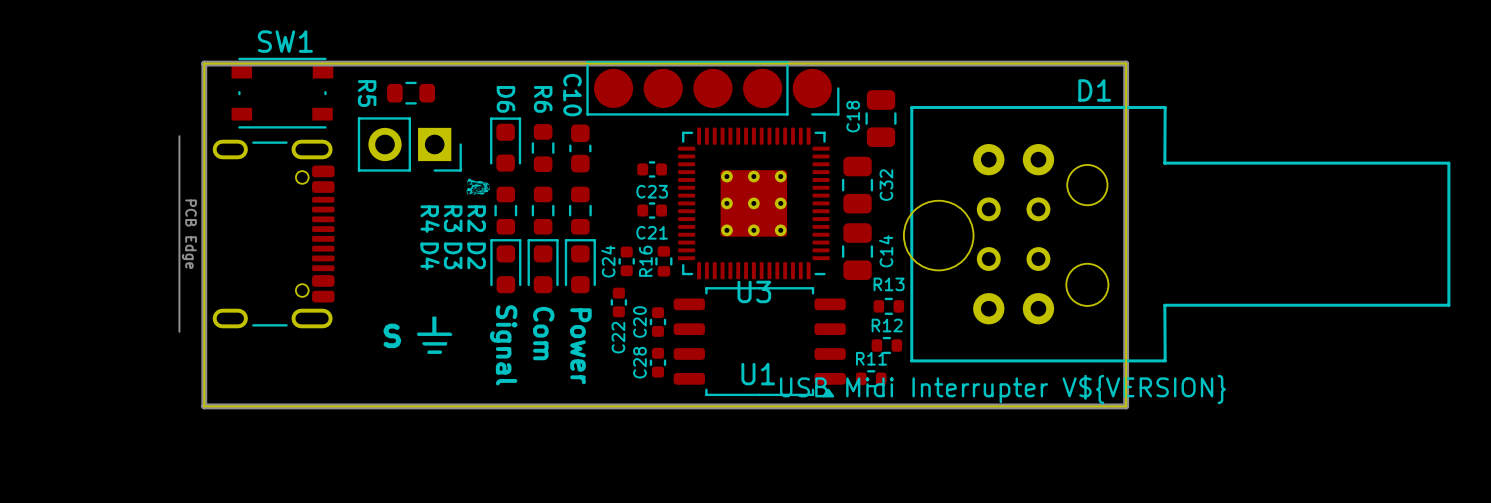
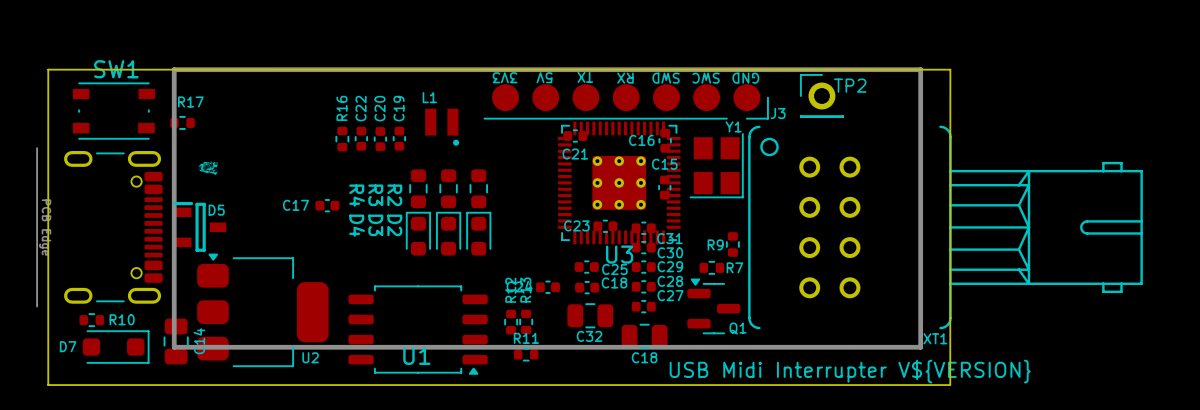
board edge: (204, 63) (204, 406) (1126, 406) (1126, 63) -> (174, 69) (48, 69) (48, 385) (950, 385) (950, 69) (920, 69)
text: none -> 3V3 (505, 77)
text: none -> 5V (544, 77)
text: none -> TX (585, 77)
text: none -> RX (625, 78)
text: none -> SWD (666, 78)
text: none -> SWC (706, 78)
text: none -> GND (745, 78)
part: (712, 88) -> none
SW1 position: (282, 93) -> (113, 111)
R5: (411, 93) -> none
TP2: none -> (821, 96)
J3: none -> (626, 101)
C18 name position: C18 (853, 116) -> C18 (644, 357)
C18 rotation: 0° (881, 118) -> 90° clockwise (644, 336)
C18 position: (881, 118) -> (644, 336)
R17: none -> (182, 122)
L1: none -> (442, 127)
part: (409, 144) -> none
D6: (505, 144) -> none
C19: none -> (399, 138)
R6: (543, 148) -> none
C10: (580, 148) -> none
C16: none -> (665, 140)
round board edge: [1066, 164, 1109, 206] -> none
C23 position: (652, 169) -> (605, 226)
drawing: none -> [198, 161, 218, 176]
drawing: [466, 178, 491, 196] -> none
Y1: none -> (716, 165)
C32 rotation: 0° (857, 185) -> 90° clockwise (590, 315)
C32 position: (857, 185) -> (590, 315)
C23 name position: C23 (652, 191) -> C23 (576, 225)
drawing position: (475, 192) -> (210, 163)
round board edge: [903, 200, 975, 271] -> none
C15: none -> (664, 187)
C21 position: (652, 210) -> (575, 135)
C17: none -> (327, 205)
part position: (256, 233) -> (99, 227)
D1: (1180, 234) -> none
C14 position: (857, 251) -> (176, 341)
D5: none -> (199, 226)
XT1: none -> (945, 227)
C31: none -> (643, 228)
C24 rotation: 0° (626, 261) -> 90° clockwise (547, 287)
C24 position: (626, 261) -> (547, 287)
R16 name position: R16 (645, 261) -> R16 (342, 108)
R16 position: (663, 261) -> (342, 139)
round board edge: [1065, 263, 1109, 307] -> none
R9: none -> (732, 244)
C30: none -> (643, 247)
C22 position: (618, 302) -> (361, 138)
R13 rotation: 0° (888, 306) -> 90° clockwise (526, 321)
R13 position: (888, 306) -> (526, 321)
C25: none -> (586, 267)
C29: none -> (643, 267)
R7: none -> (711, 267)
drawing: [417, 316, 453, 354] -> none
C20 name position: C20 (639, 322) -> C20 (380, 108)
C20 position: (658, 322) -> (380, 139)
C18: none -> (587, 287)
text: Com (543, 333) -> none
text: s (392, 335) -> none
C22 name position: C22 (618, 337) -> C22 (361, 108)
U1 position: (759, 342) -> (418, 330)
text: Signal (503, 345) -> none
R12 rotation: 0° (886, 345) -> 90° clockwise (511, 322)
R12 position: (886, 345) -> (511, 322)
text: Power (580, 346) -> none
Q1: none -> (713, 306)
C27: none -> (643, 306)
U2: none -> (262, 310)
C28 rotation: 0° (658, 362) -> 90° clockwise (643, 286)
C28 position: (658, 362) -> (643, 286)
R10: none -> (91, 320)
R11 position: (871, 378) -> (526, 354)
text position: USB Midi Interrupter V${VERSION} (1002, 389) -> USB Midi Interrupter V${VERSION} (850, 371)
D7: none -> (116, 347)

